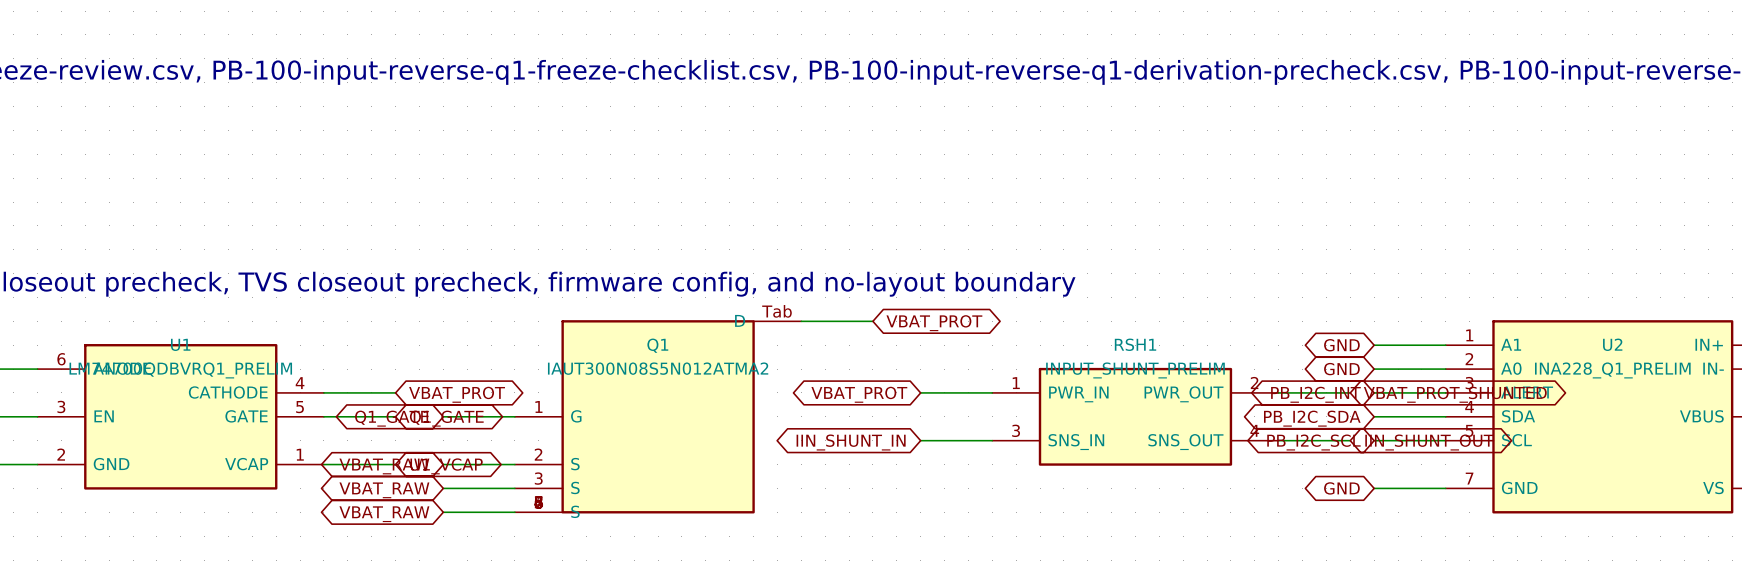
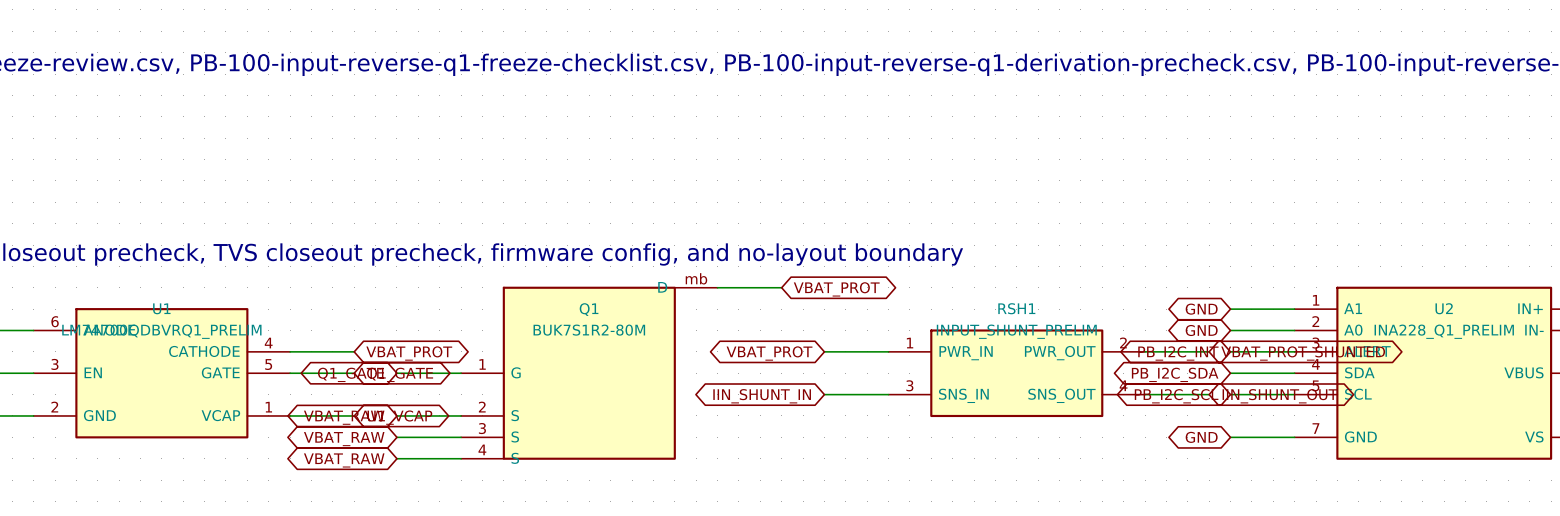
Q1 symbol: [514, 320, 802, 514] -> [461, 286, 718, 460]
Q1 value: IAUT300N08S5N012ATMA2 (658, 368) -> BUK7S1R2-80M (589, 330)

